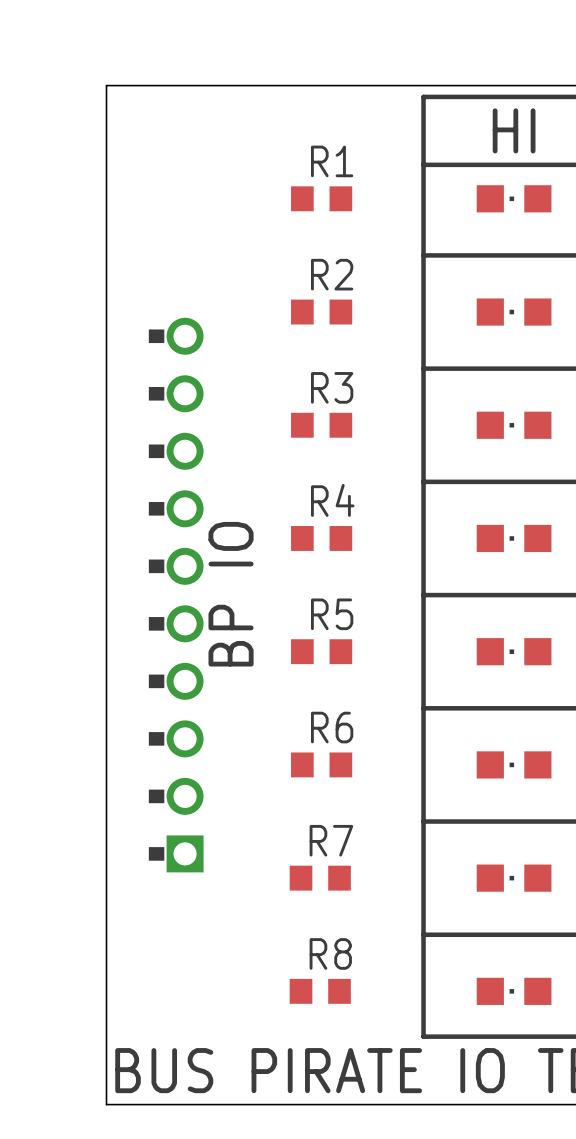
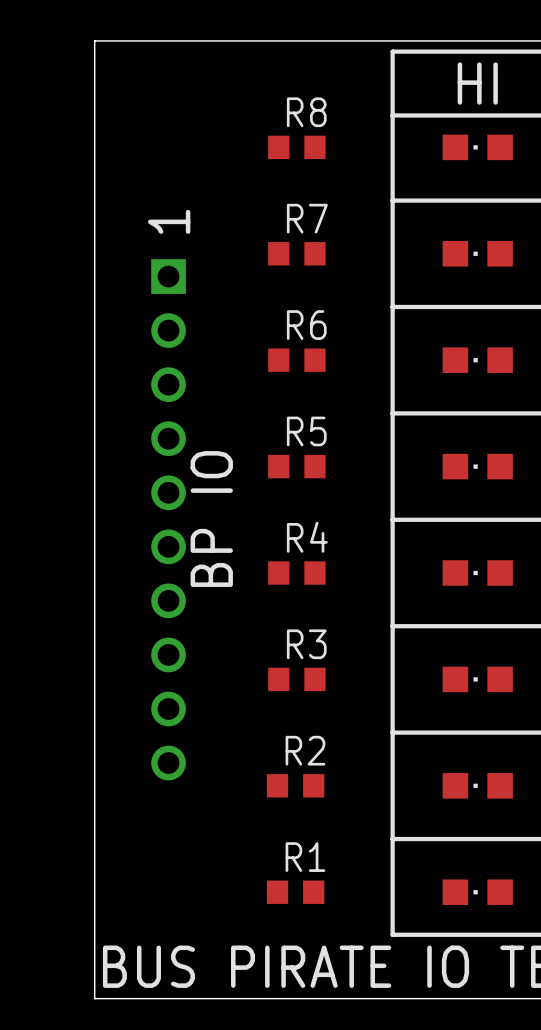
R1 name: R1 (332, 161) -> R8 (306, 112)
R2 name: R2 (332, 274) -> R7 (307, 218)
text: none -> 1 (169, 221)
R3 name: R3 (332, 387) -> R6 (306, 325)
R4 name: R4 (332, 500) -> R5 (306, 431)
part side: top (176, 595) -> bottom (168, 519)
R5 name: R5 (332, 614) -> R4 (307, 537)
R6 name: R6 (332, 727) -> R3 (306, 644)
R7 name: R7 (331, 840) -> R2 (305, 750)
R8 name: R8 (330, 953) -> R1 (305, 857)

